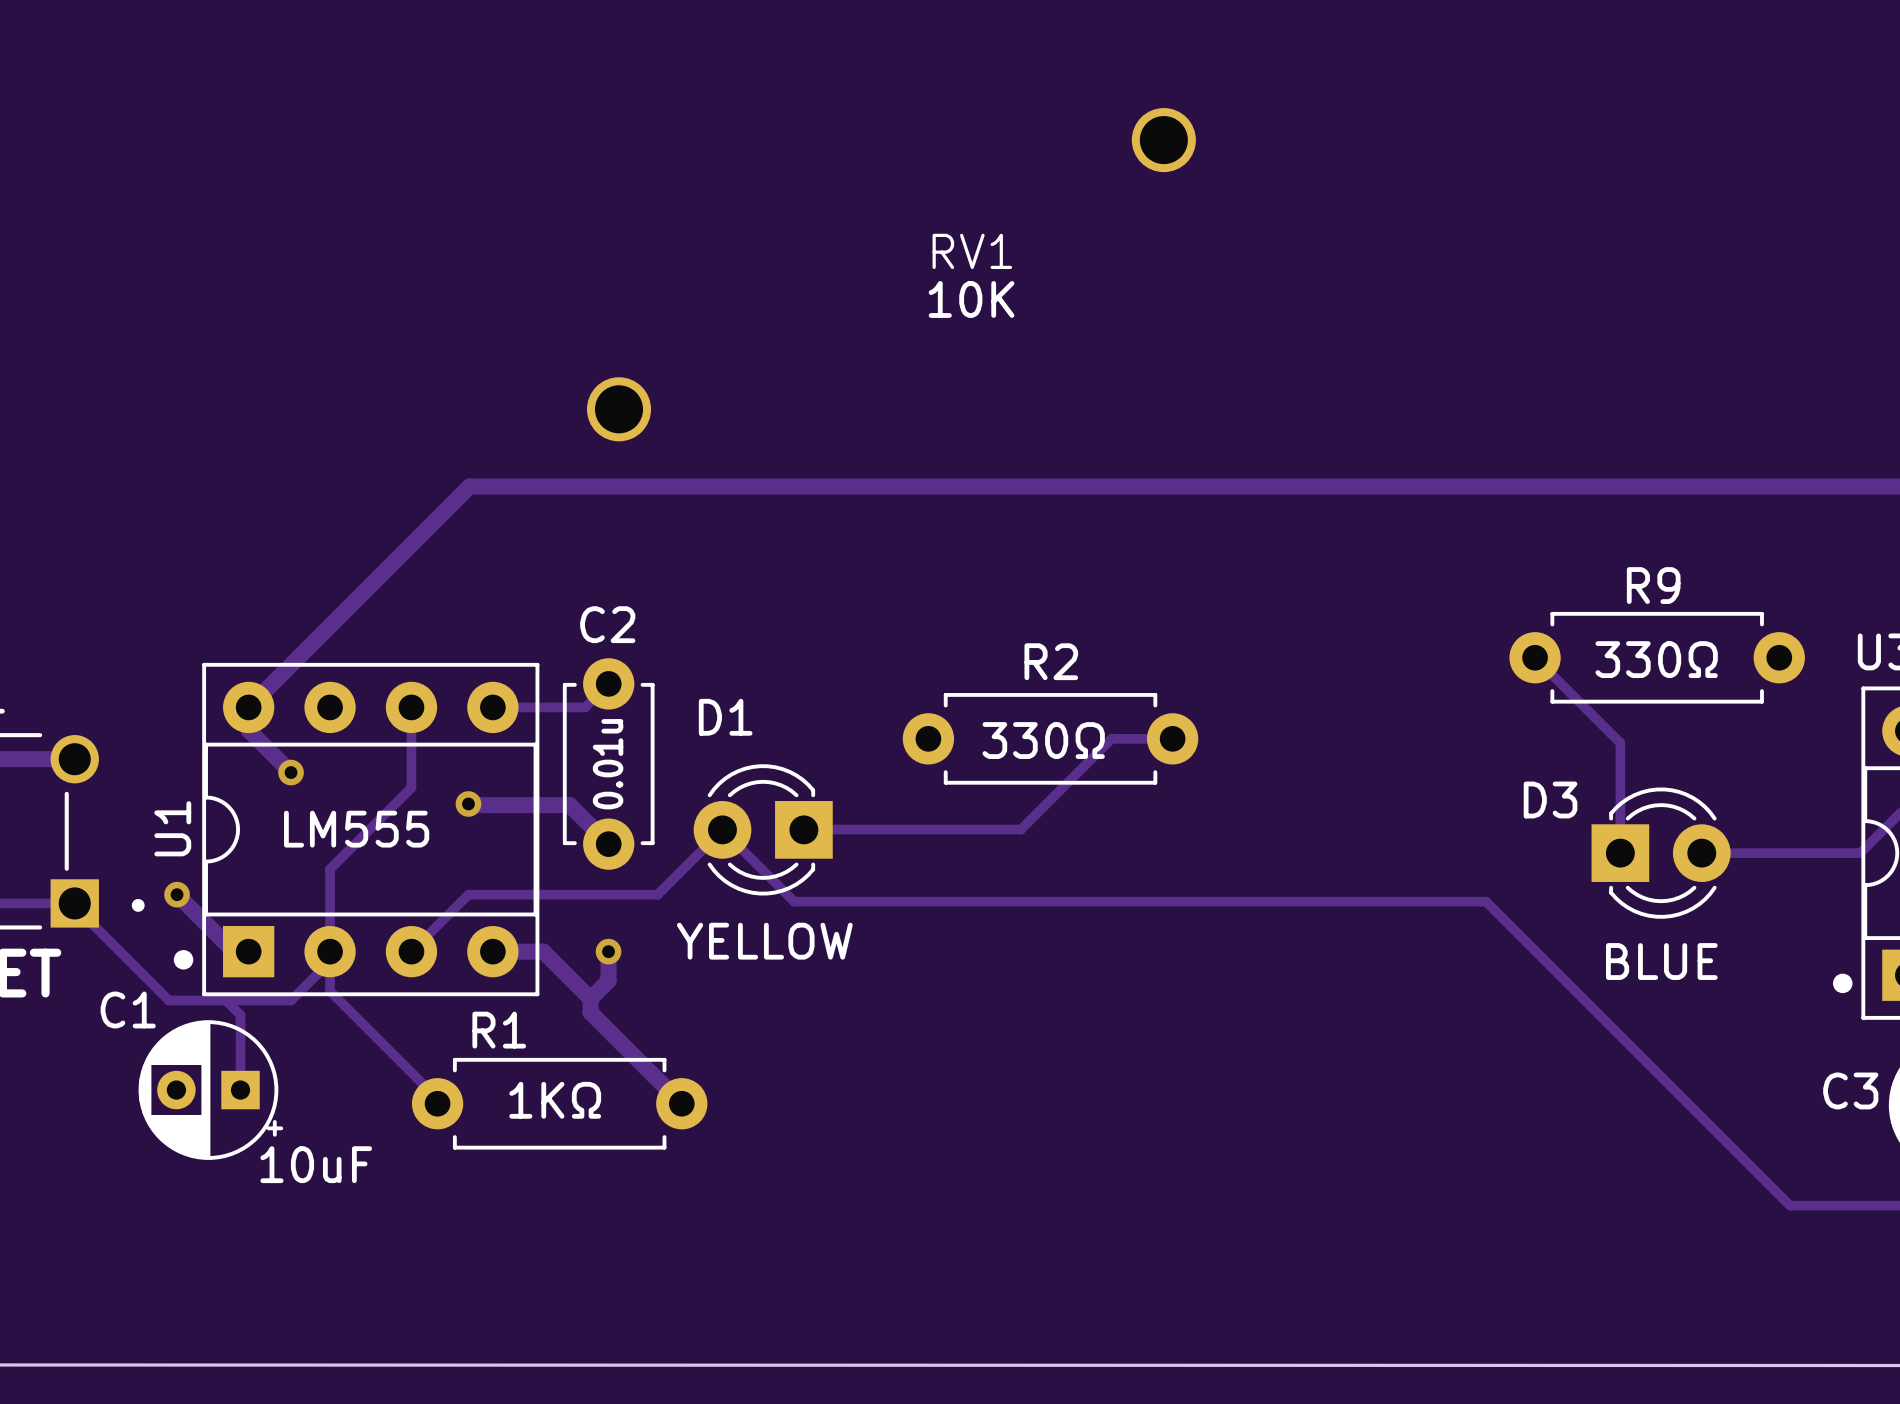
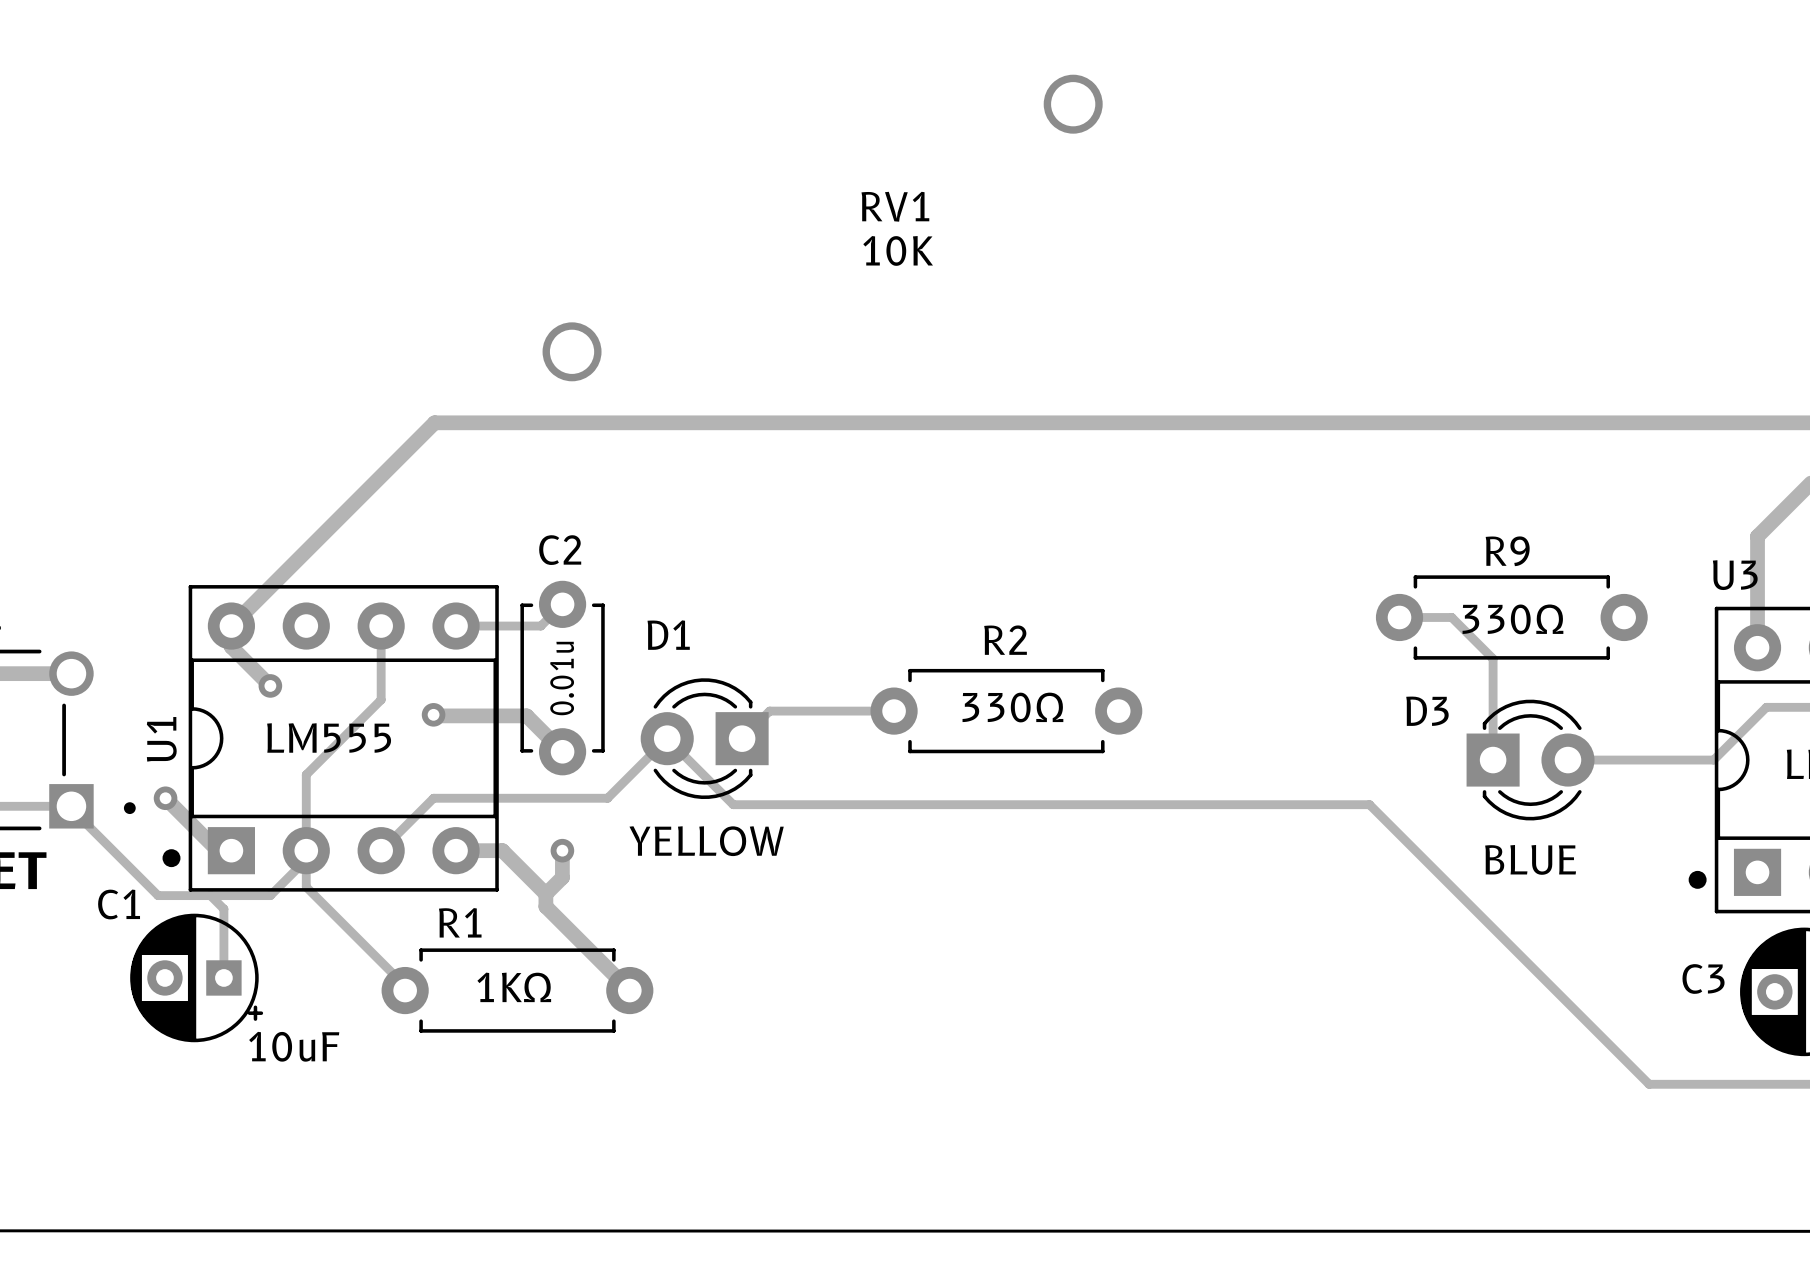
track: (1535, 657) (1575, 698) -> (1399, 617) (1451, 617)
R9 position: (1657, 657) -> (1511, 617)
R2 position: (1050, 738) -> (1006, 711)
track: (1172, 738) (1111, 738) (1020, 829) (804, 829) -> (894, 711) (769, 711) (742, 738)
R2 value position: 330Ω (1043, 740) -> 330Ω (1012, 707)

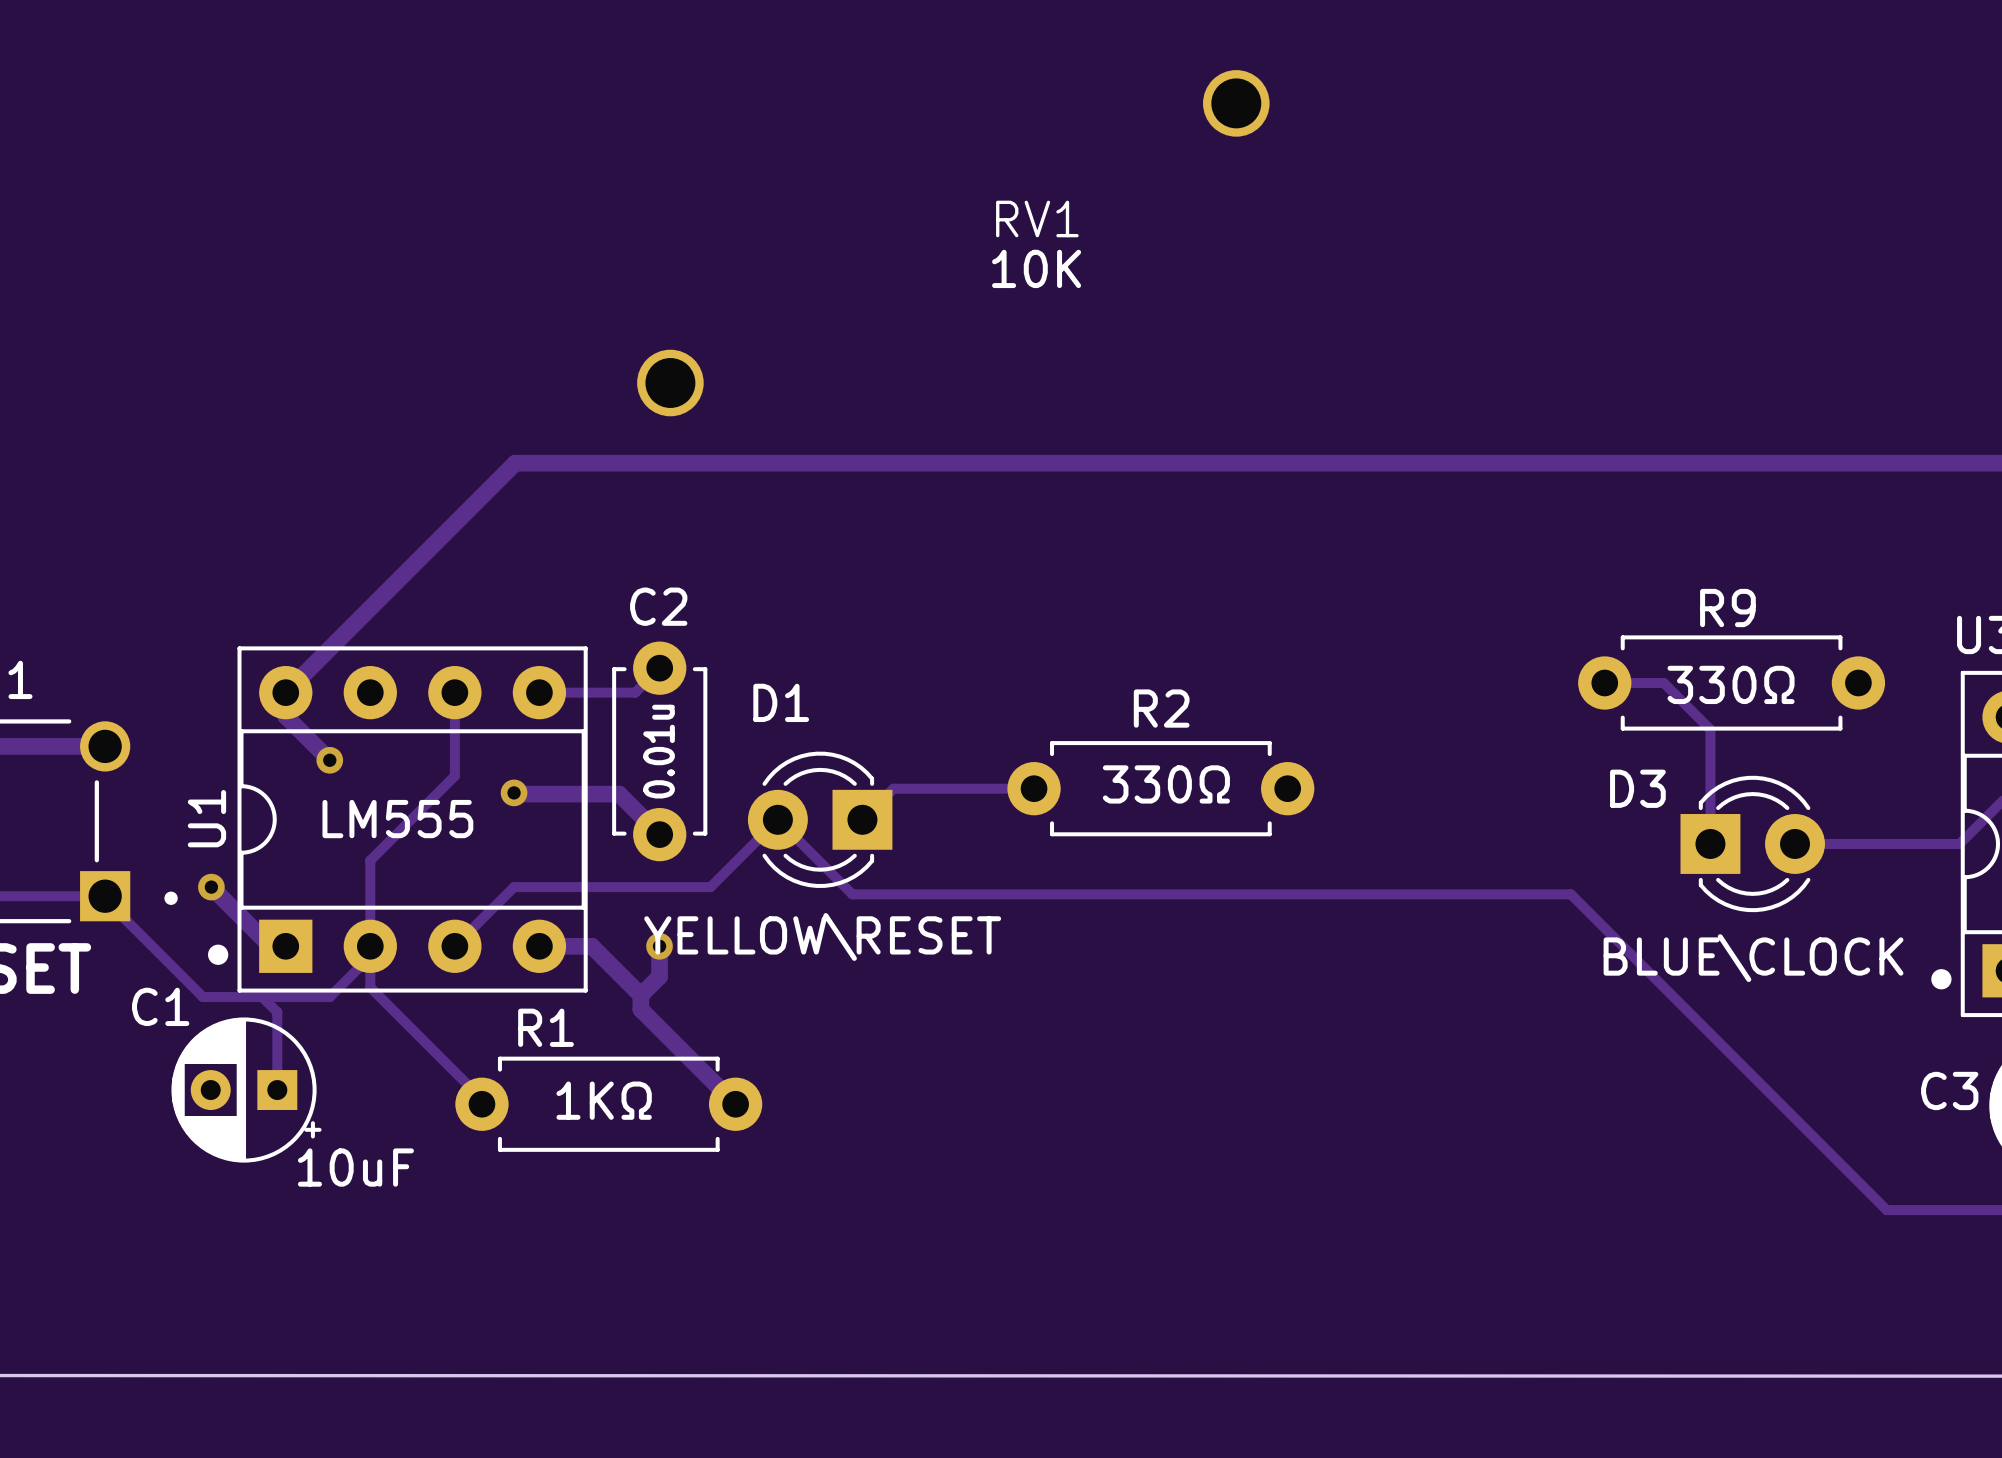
D1 value: YELLOW (706, 841) -> YELLOW\RESET (822, 936)
D3 value: BLUE (1530, 859) -> BLUE\CLOCK (1753, 958)

